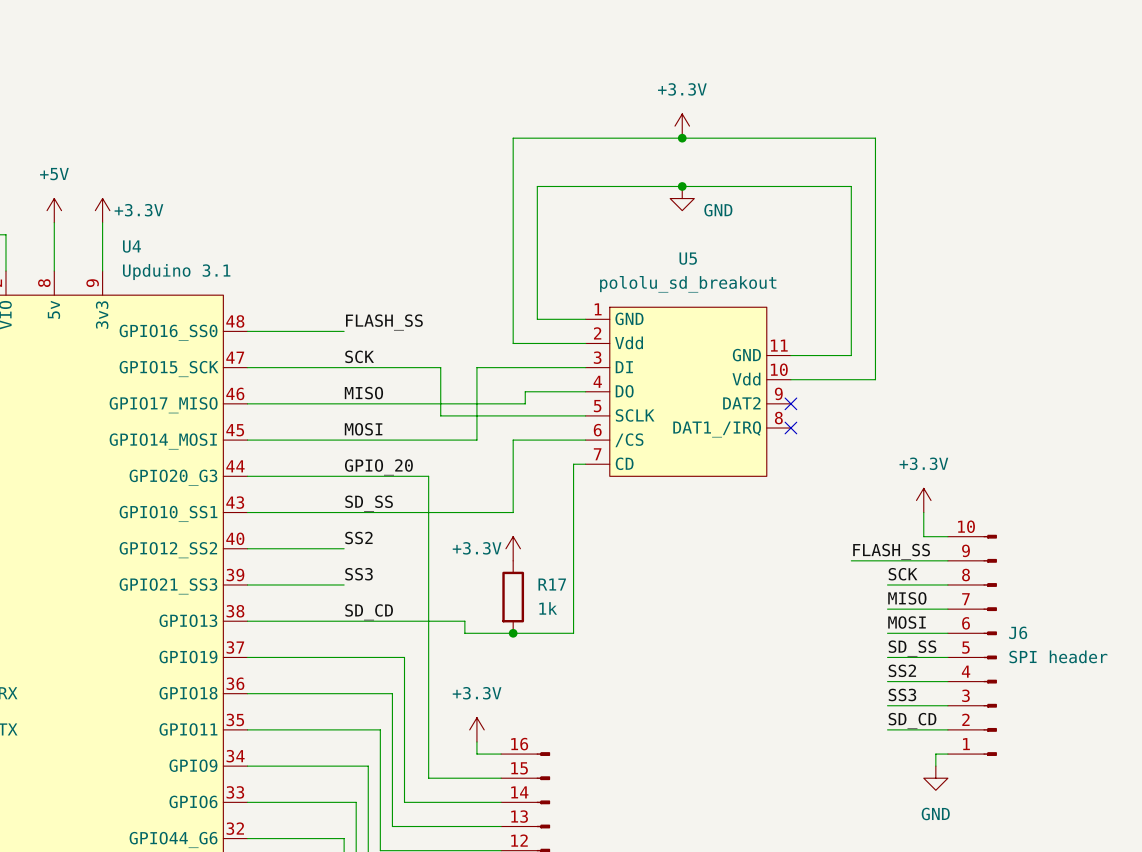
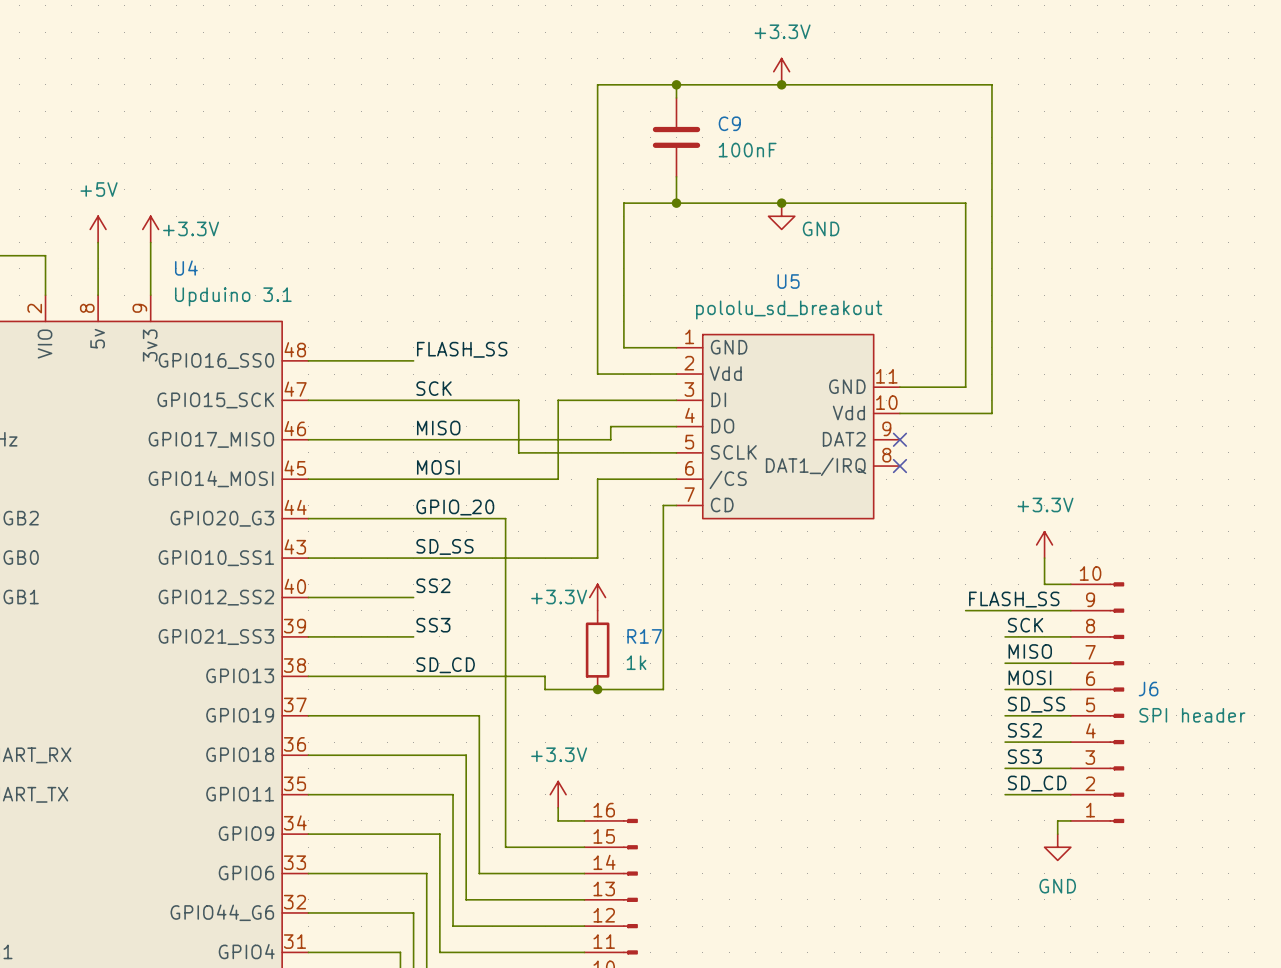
wire: none -> (676, 84) (676, 97)
junction: none -> (676, 84)
junction: none -> (781, 84)
C9: none -> 100nF (676, 137)
power symbol position: +3.3V (682, 126) -> +3.3V (781, 71)
wire: (513, 138) (875, 138) -> (597, 150) (597, 84) (991, 84) (991, 150)
junction: (682, 138) -> none
wire: none -> (676, 176) (676, 203)
junction: none -> (676, 203)

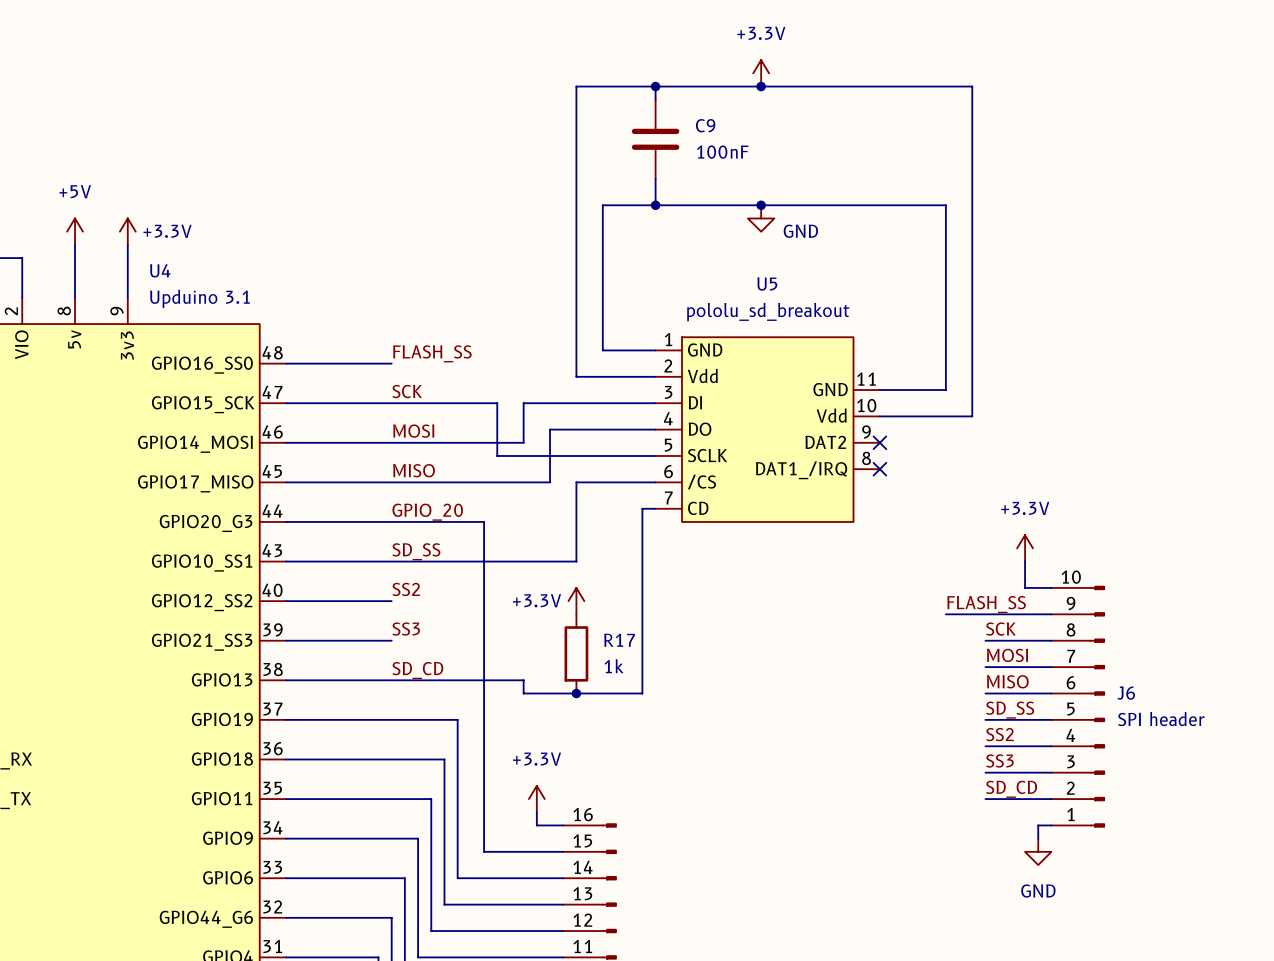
wire: (558, 400) (558, 479) -> (536, 403) (523, 403) (523, 442)
wire: (610, 426) (610, 439) (545, 439) -> (589, 429) (550, 429) (550, 482) (536, 482)
label: MISO (438, 428) -> MOSI (413, 431)
U4 pin name: GPIO17_MISO (211, 439) -> GPIO14_MOSI (195, 444)
label: MOSI (438, 467) -> MISO (414, 470)
U4 pin name: GPIO14_MOSI (211, 479) -> GPIO17_MISO (195, 483)
label: MISO (1030, 651) -> MOSI (1007, 655)
label: MOSI (1029, 677) -> MISO (1007, 681)

